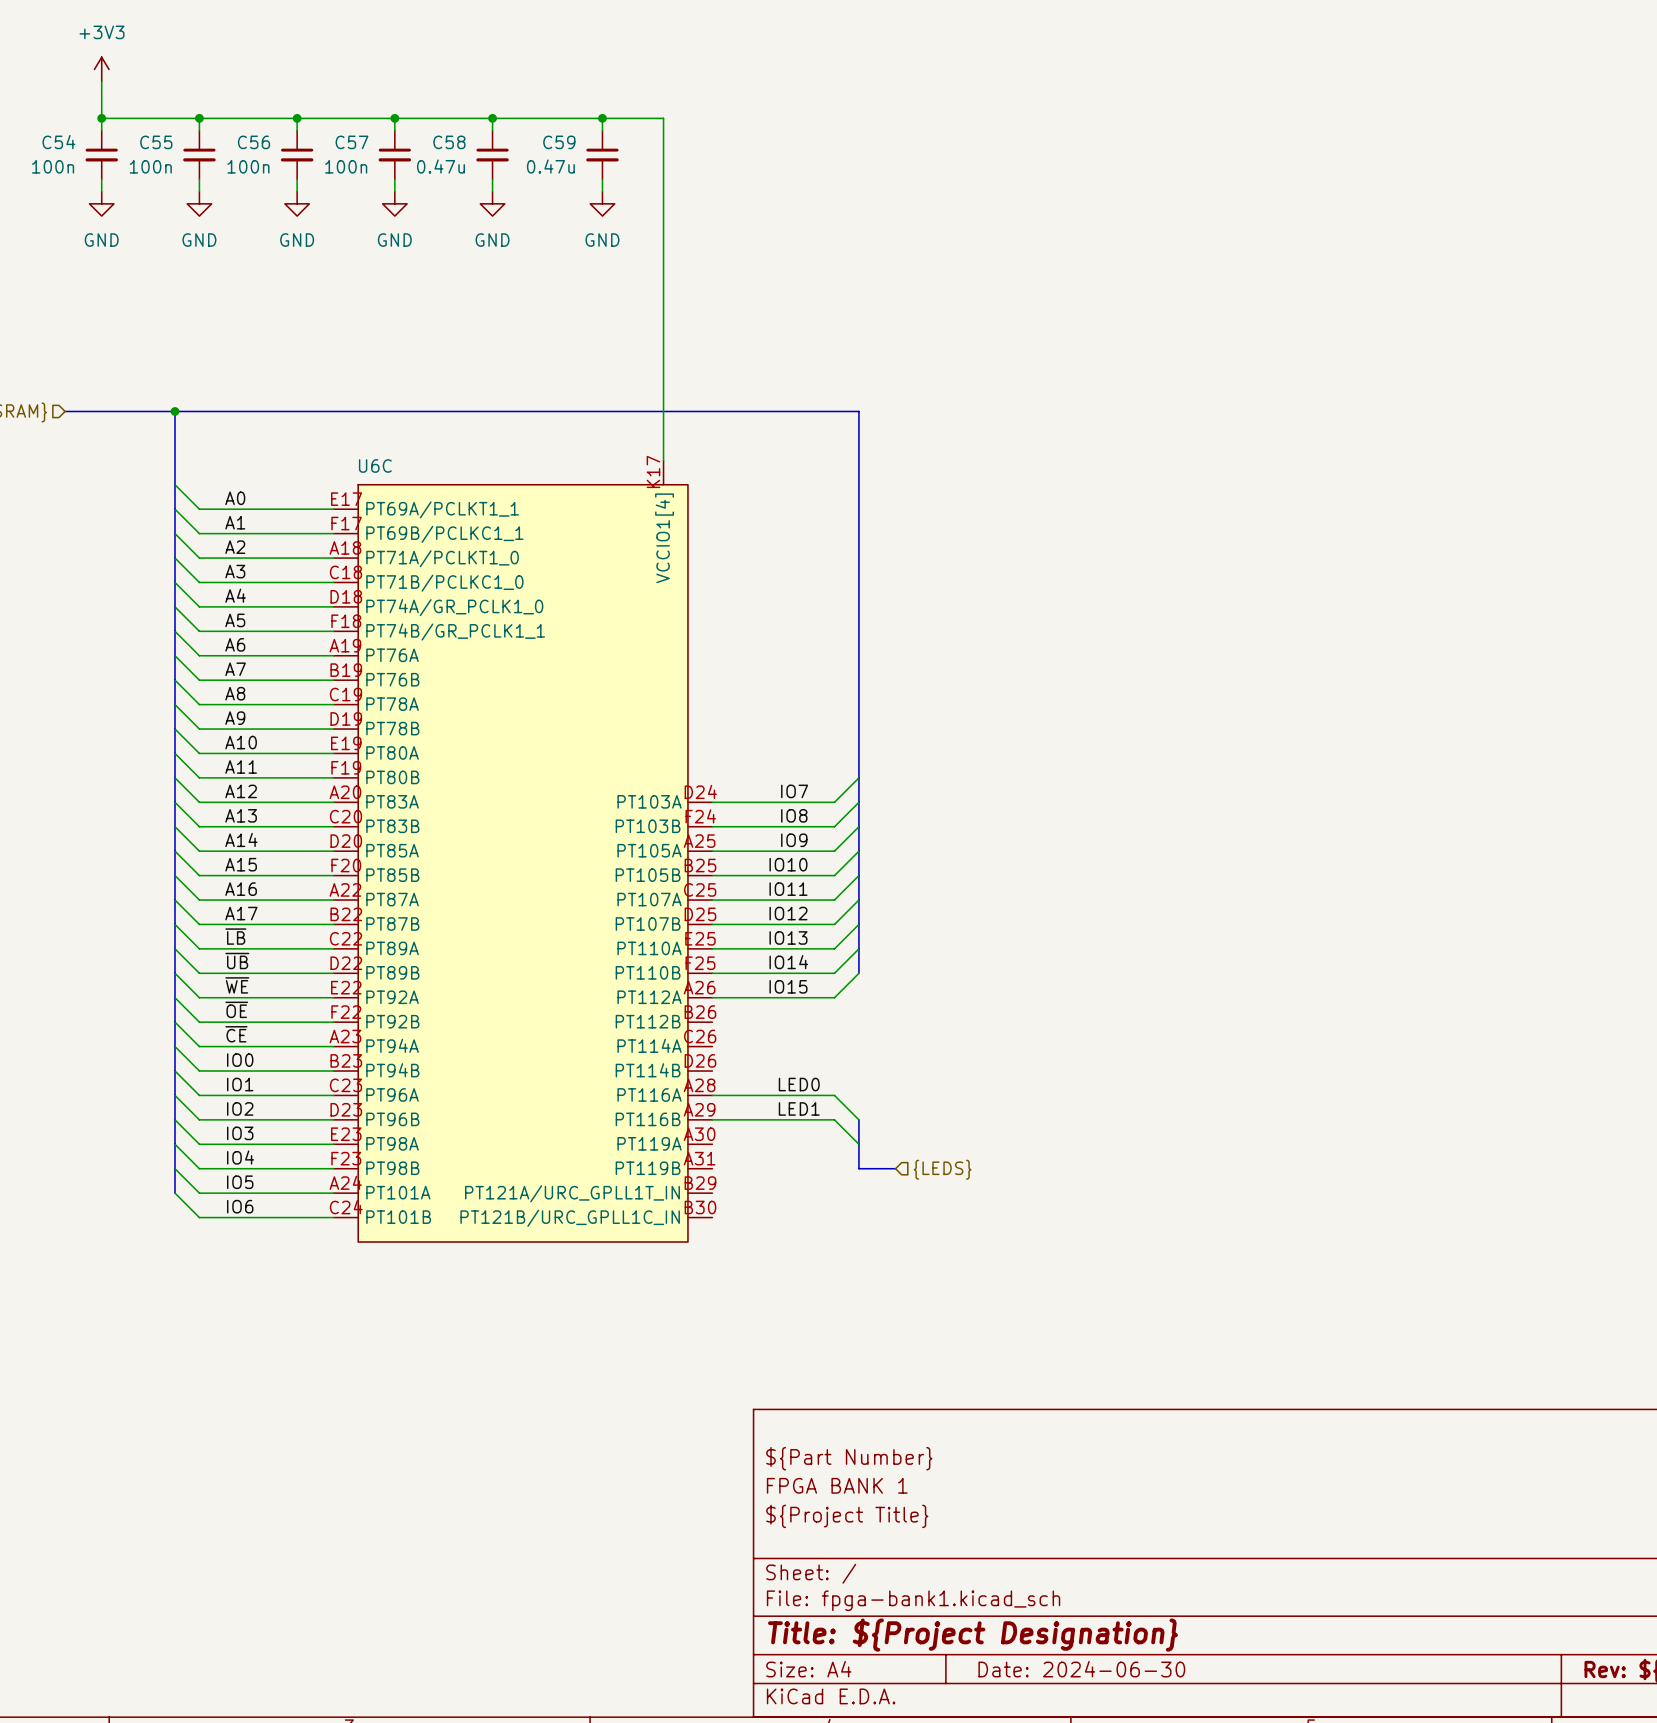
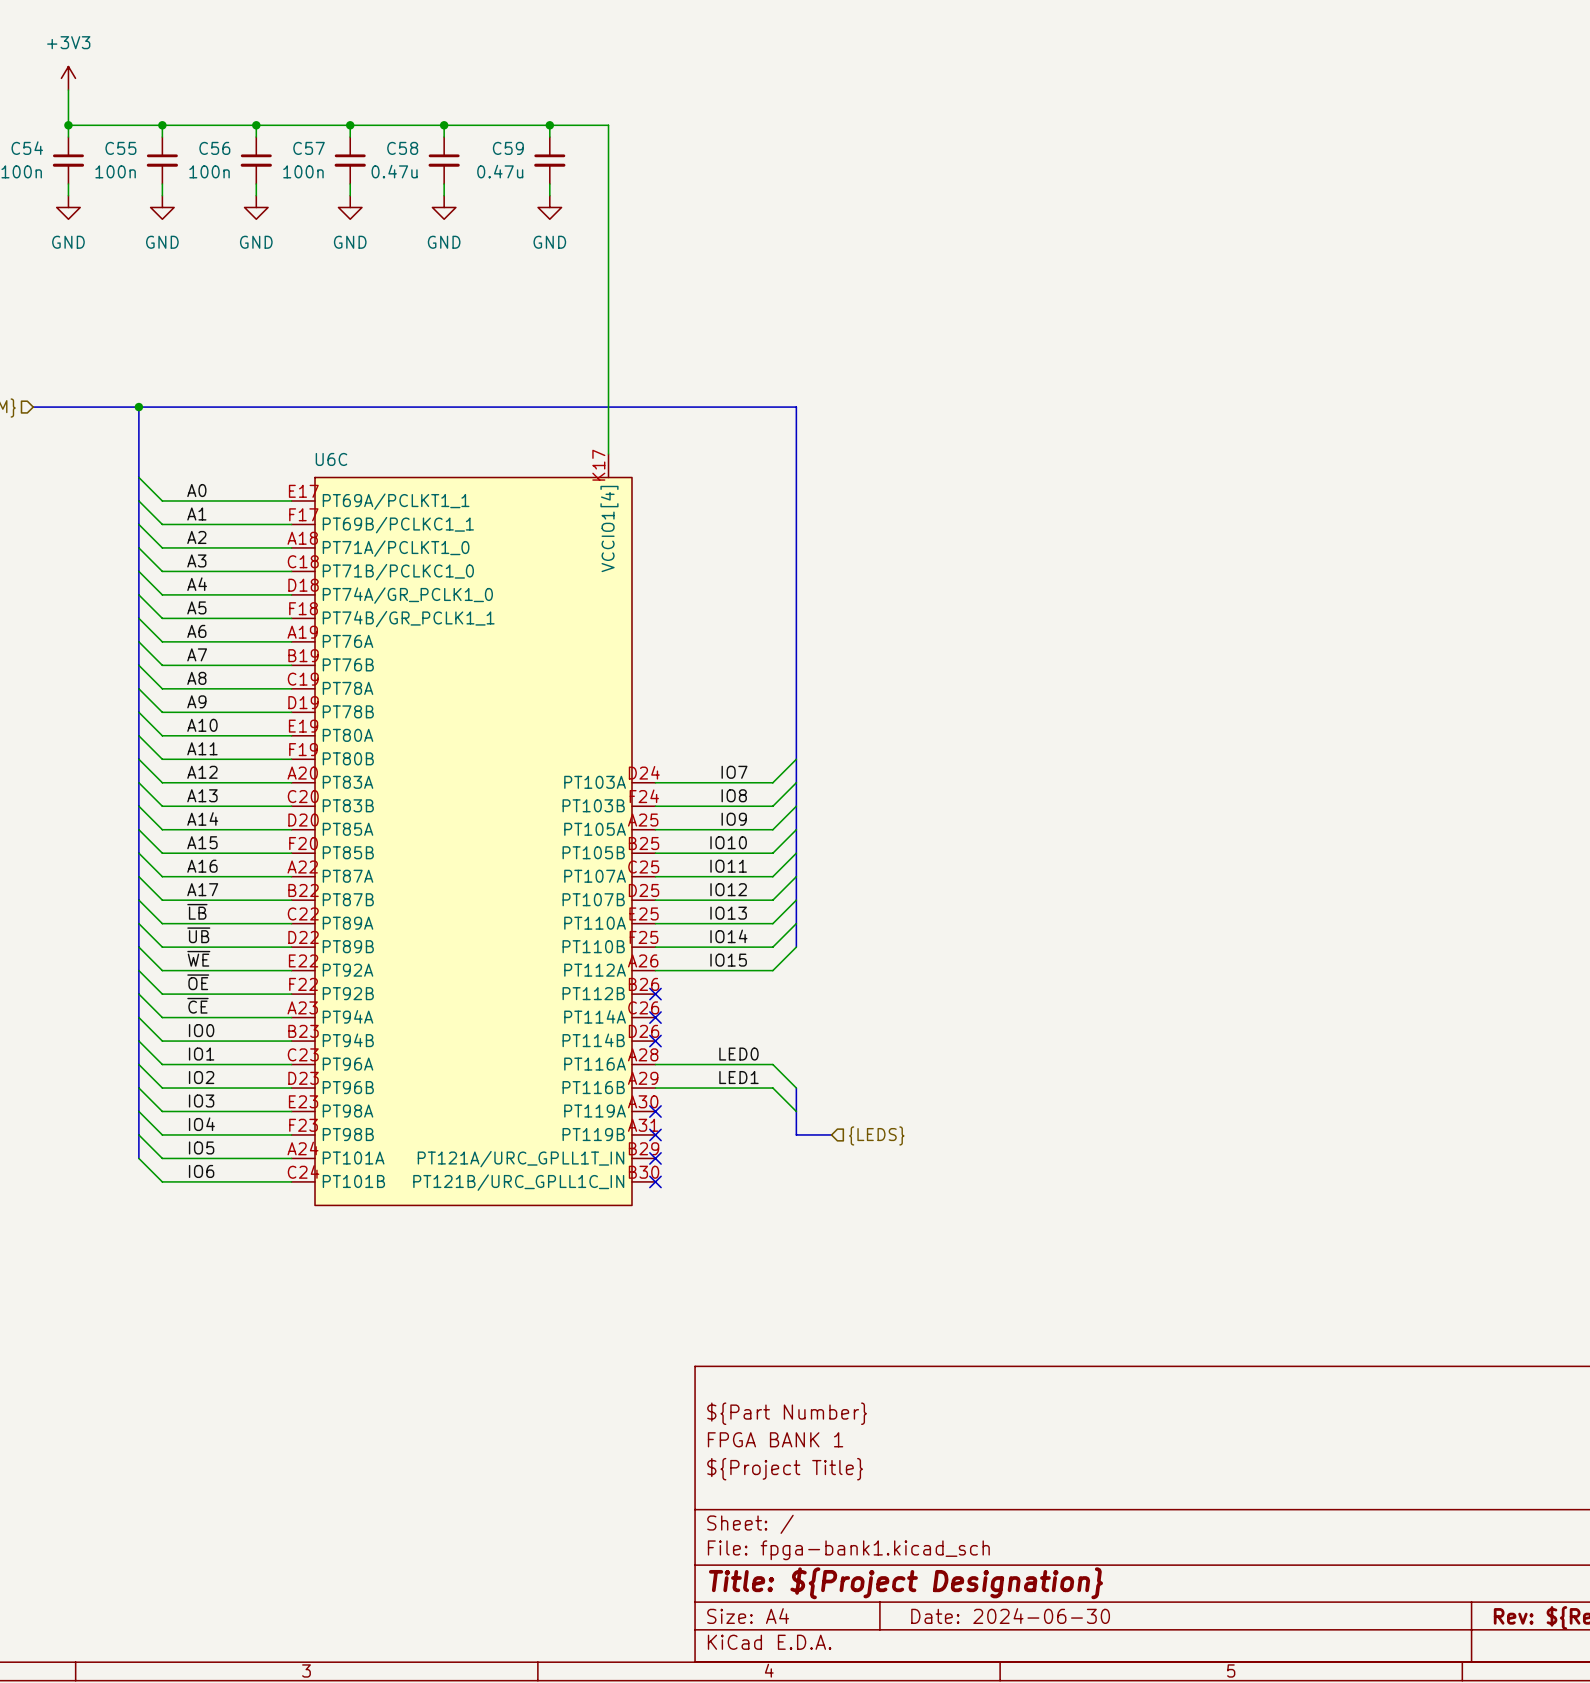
no-connect mark: none -> (655, 994)
no-connect mark: none -> (655, 1017)
no-connect mark: none -> (655, 1041)
no-connect mark: none -> (655, 1111)
no-connect mark: none -> (655, 1134)
no-connect mark: none -> (655, 1158)
no-connect mark: none -> (655, 1181)

